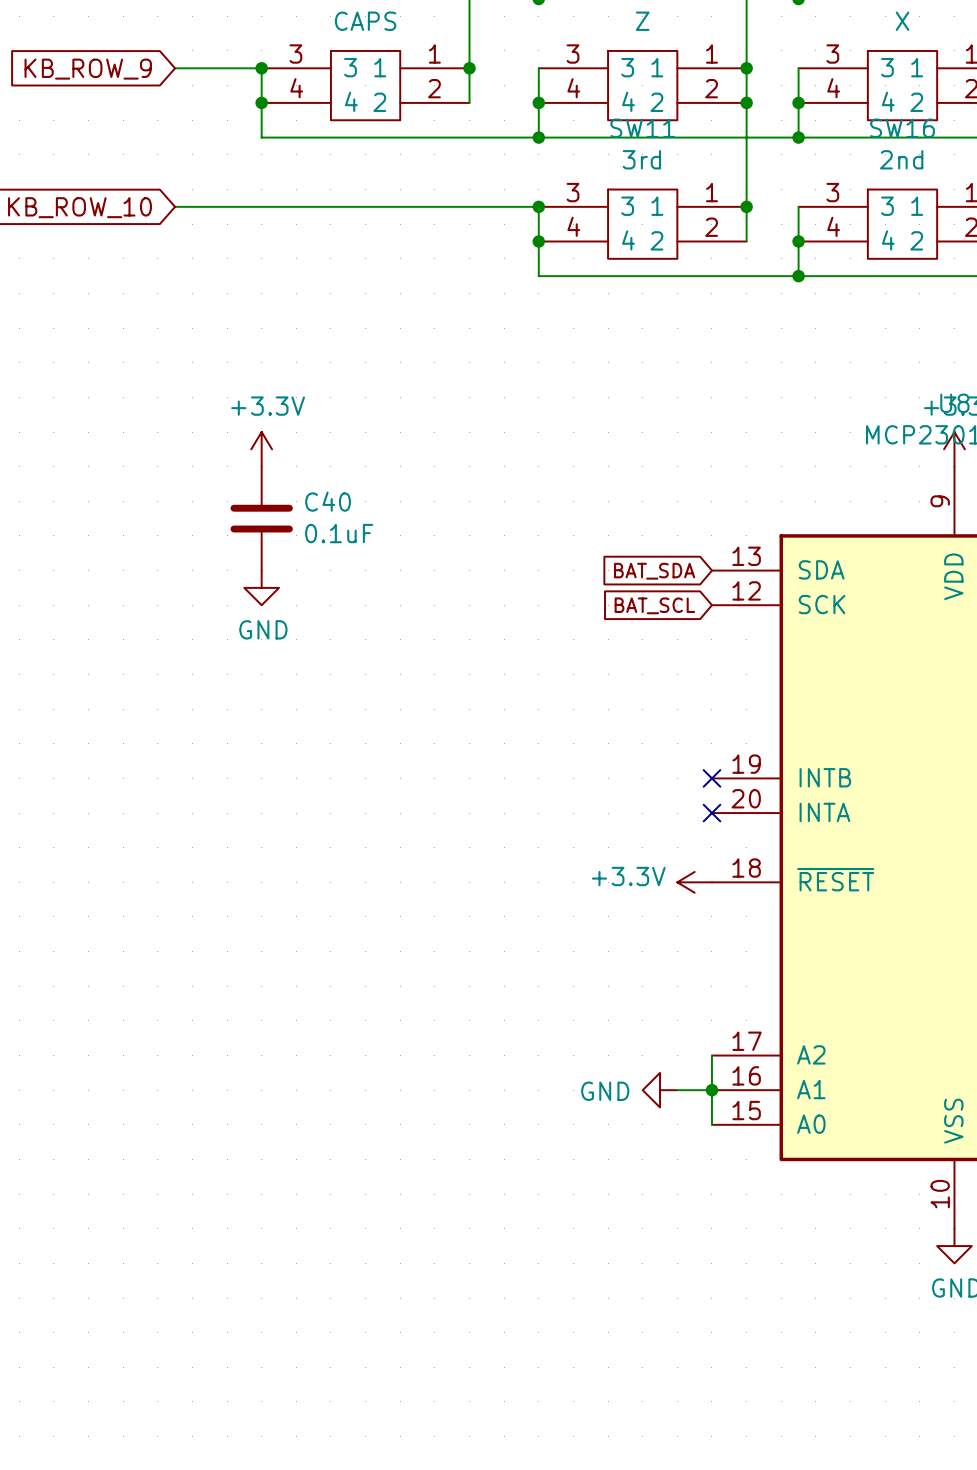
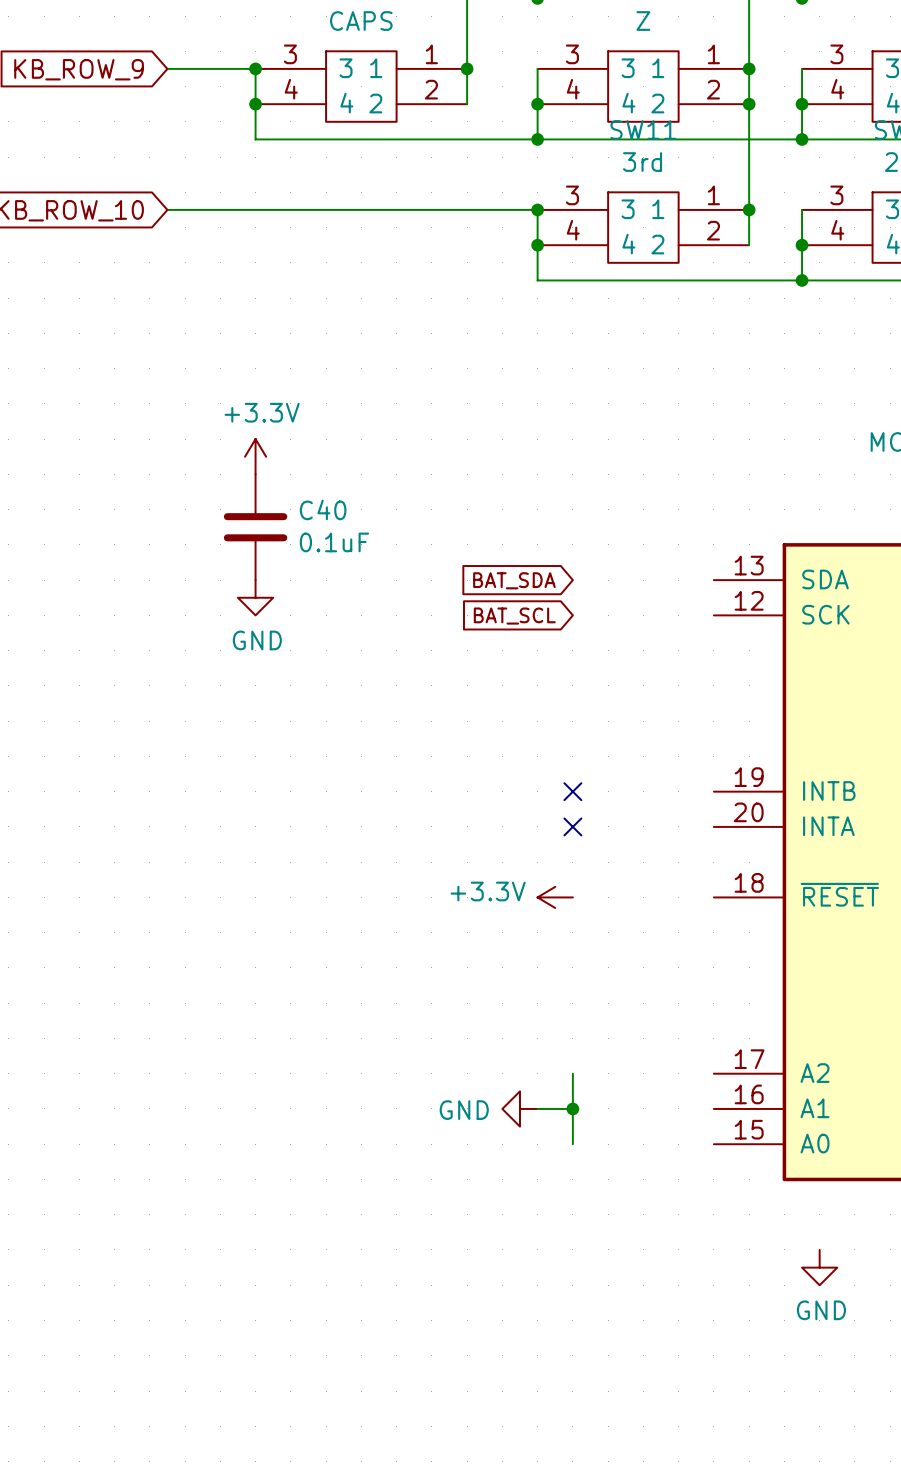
global label position: BAT_SDA (654, 571) -> BAT_SDA (514, 580)
global label position: BAT_SCL (654, 605) -> BAT_SCL (514, 616)
no-connect mark: none -> (572, 791)
no-connect mark: (711, 778) -> none
no-connect mark: none -> (572, 826)
no-connect mark: (711, 813) -> none
power symbol position: +3.3V (694, 882) -> +3.3V (555, 897)
wire: (711, 1055) (711, 1124) -> (572, 1073) (572, 1144)
power symbol: none -> GND (519, 1108)
junction: none -> (572, 1108)
power symbol: GND (660, 1090) -> none
wire: (677, 1090) (711, 1090) -> (537, 1108) (572, 1108)
junction: (711, 1090) -> none
power symbol: none -> GND (819, 1267)

